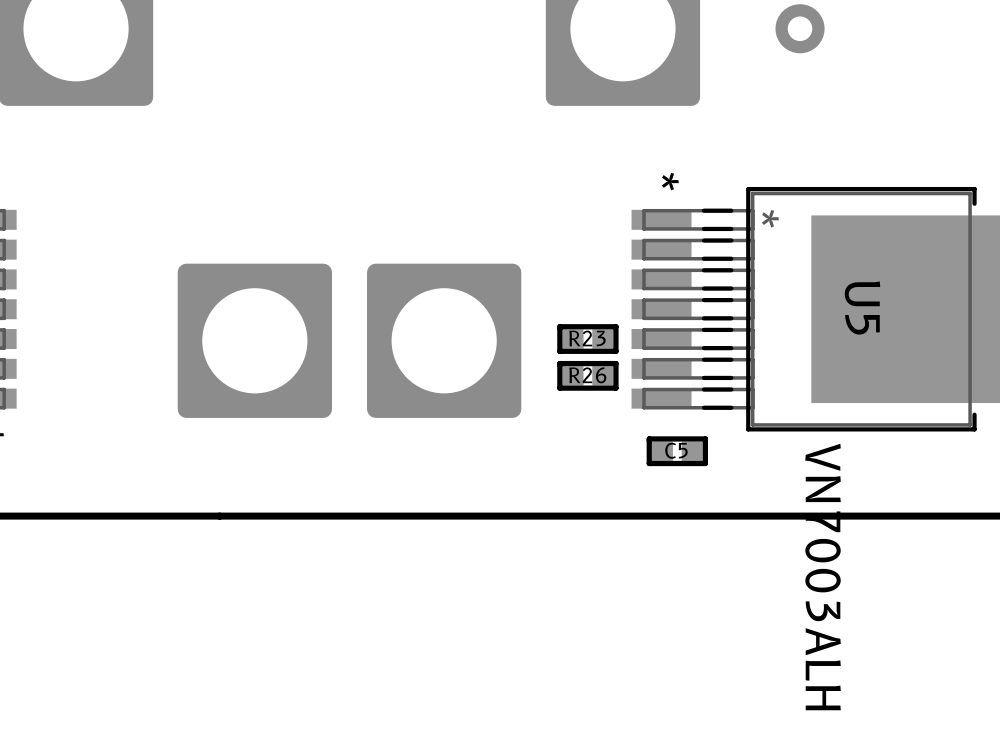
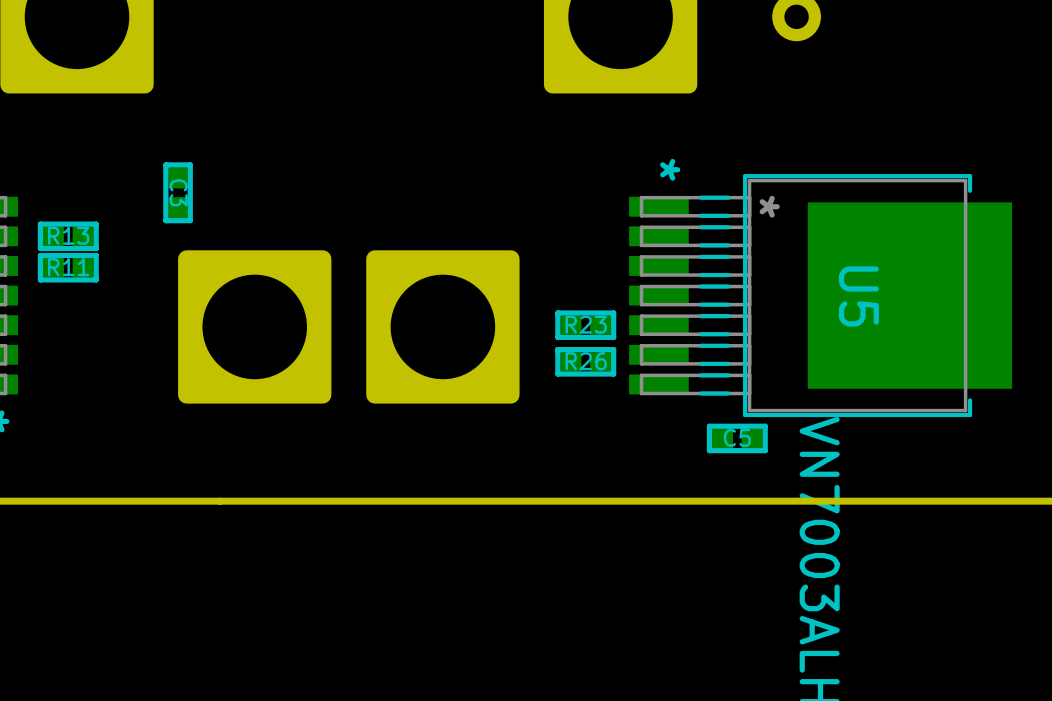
C3: none -> (178, 192)
R13: none -> (68, 236)
R11: none -> (68, 267)
C5 position: (677, 451) -> (737, 438)

